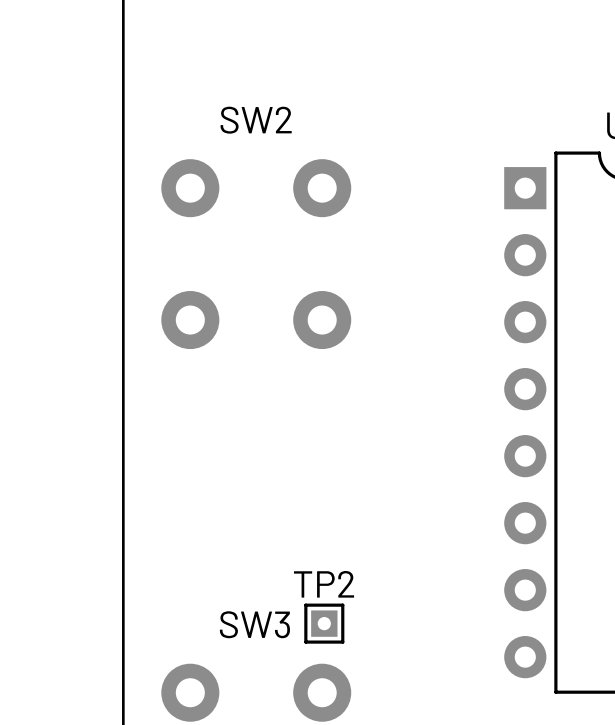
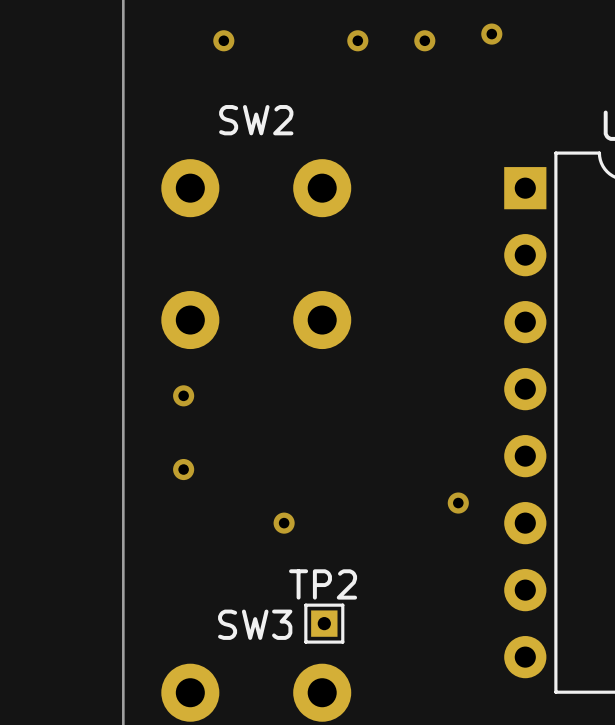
via: none -> (491, 34)
via: none -> (223, 40)
via: none -> (357, 40)
via: none -> (424, 40)
via: none -> (183, 395)
via: none -> (183, 469)
via: none -> (458, 503)
via: none -> (284, 523)

